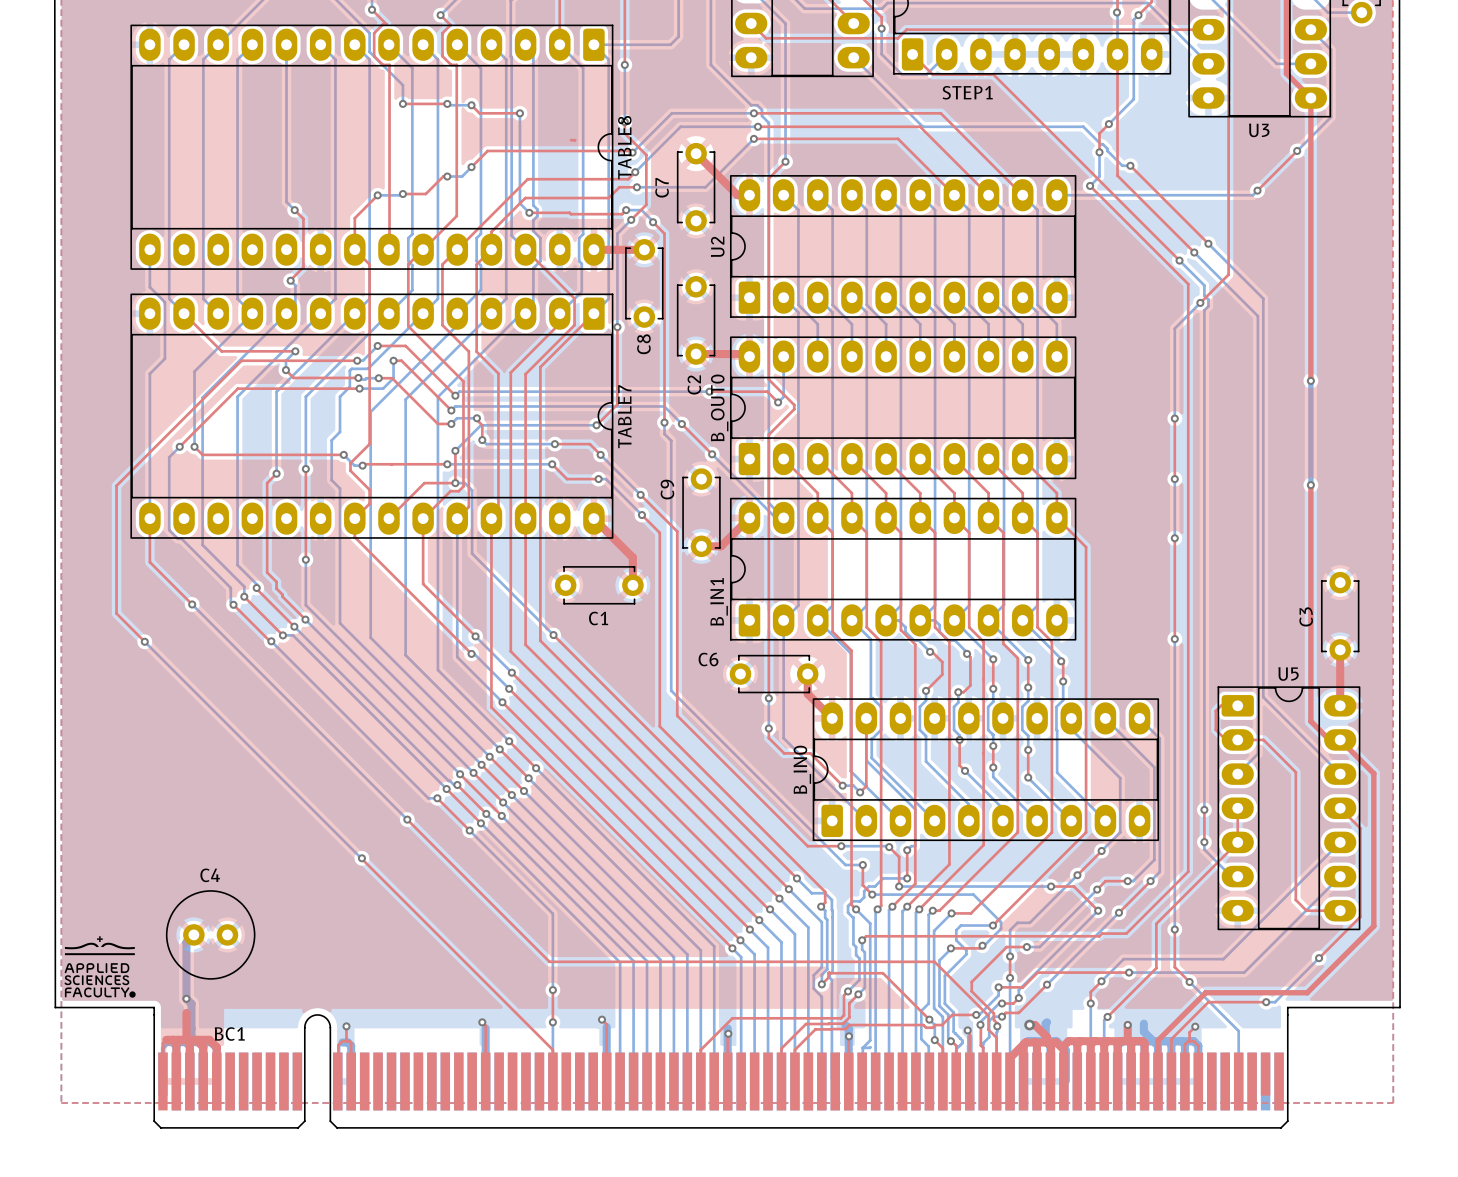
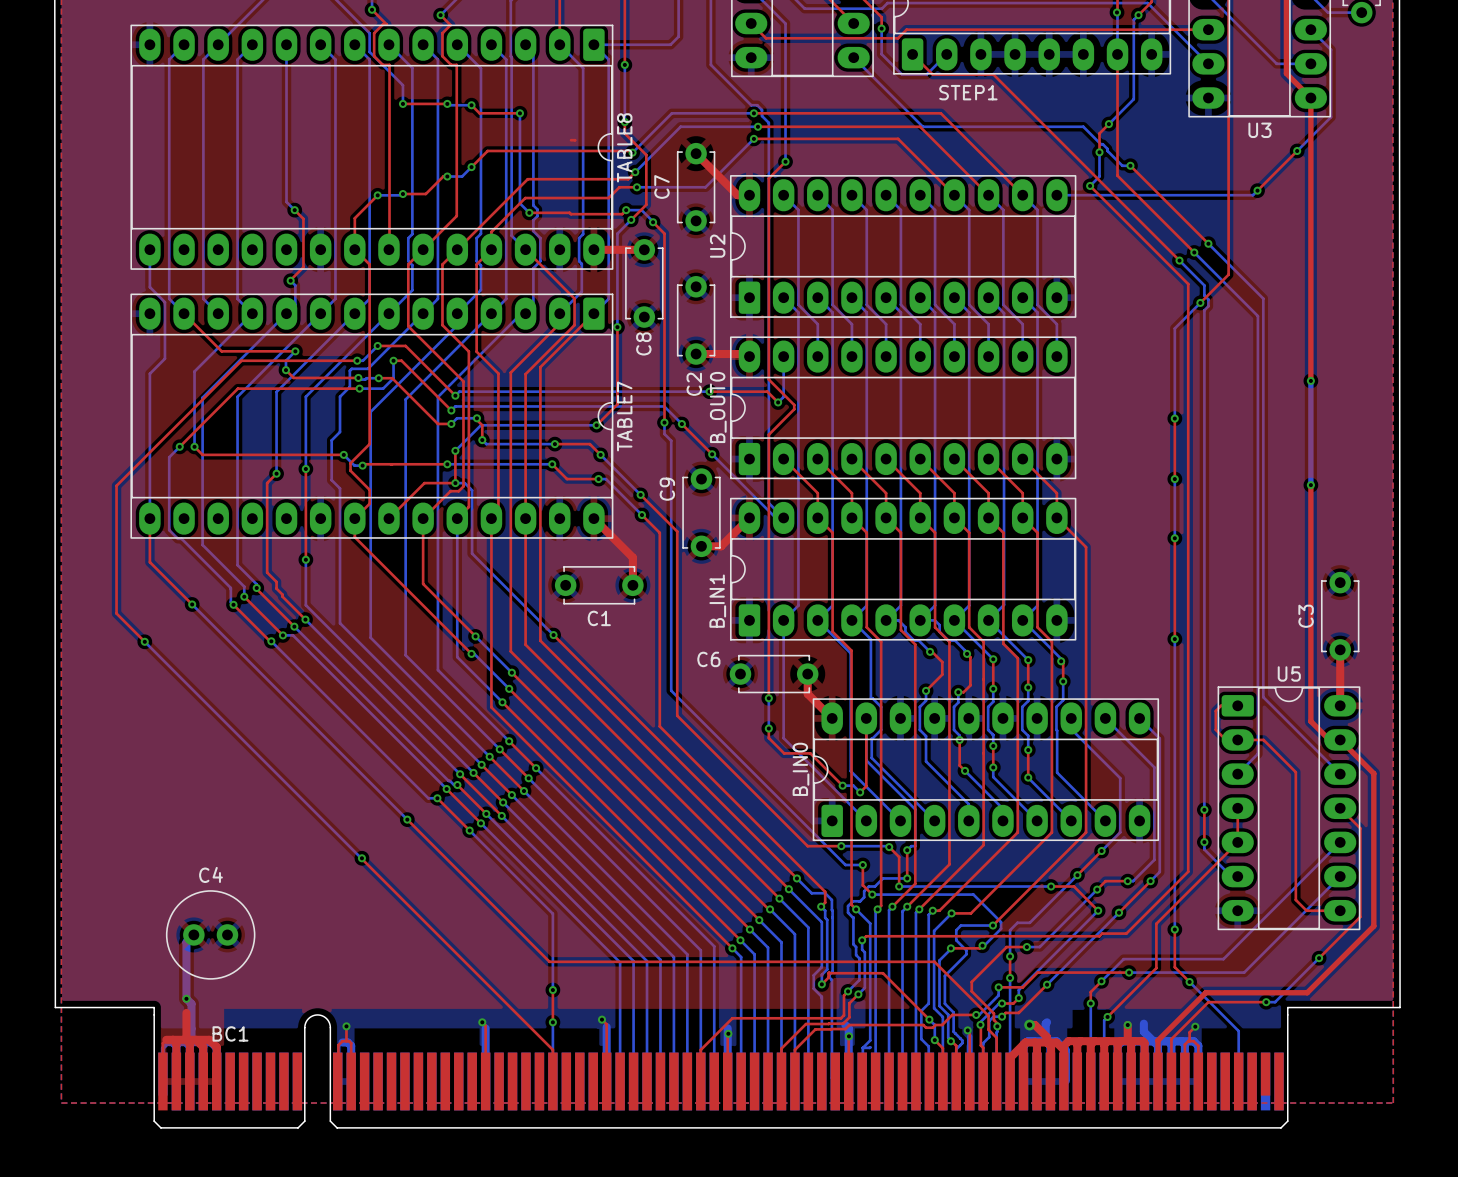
drawing: [64, 936, 136, 998] -> none

